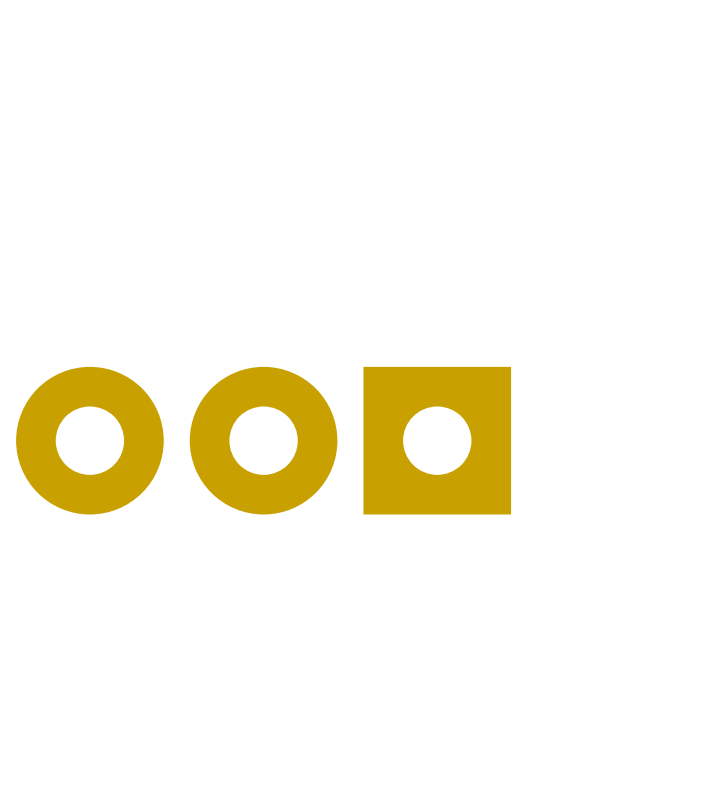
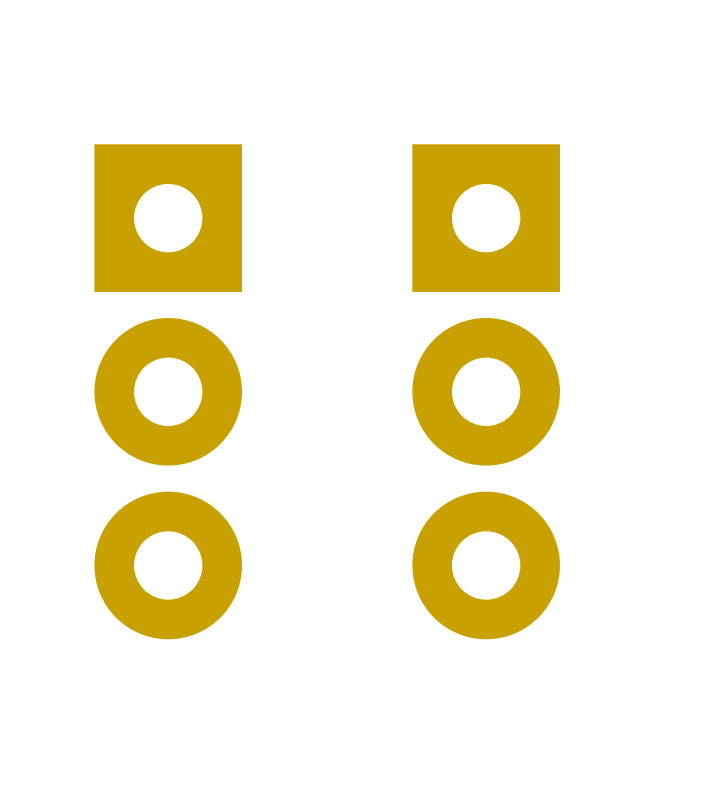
part: none -> (486, 391)
part rotation: 0° (263, 440) -> 90° counterclockwise (168, 391)

